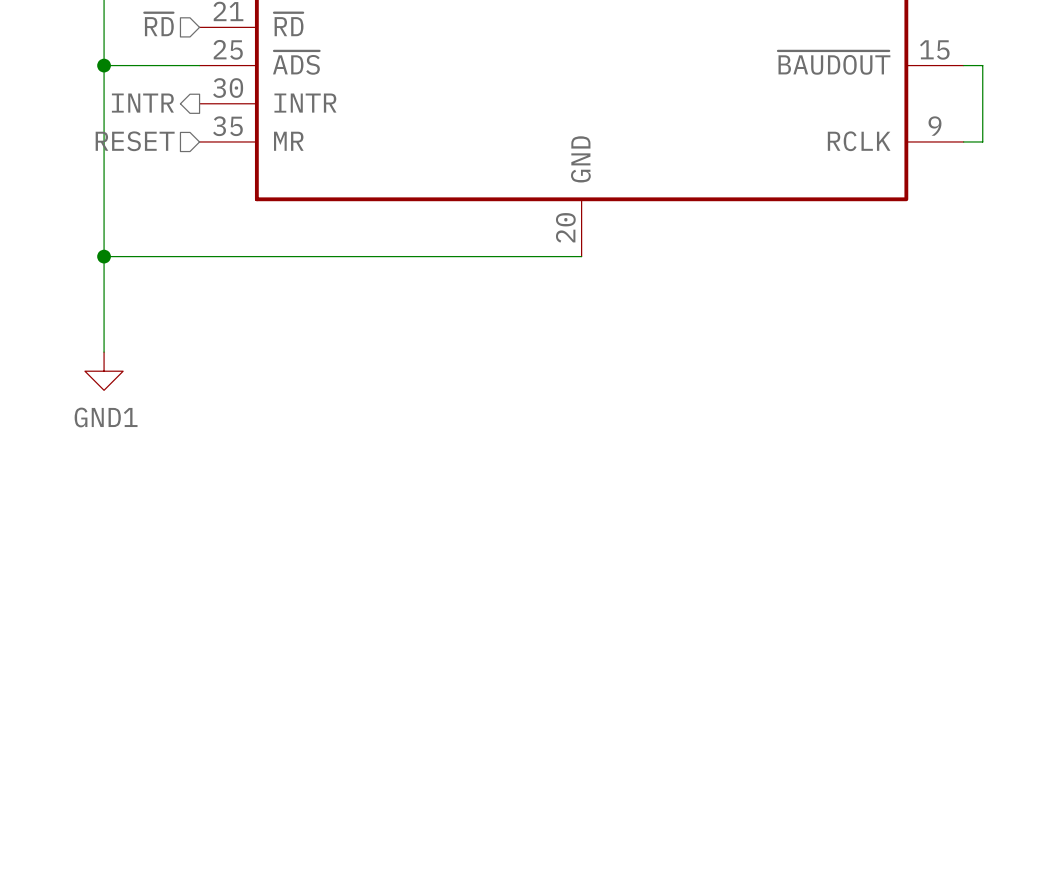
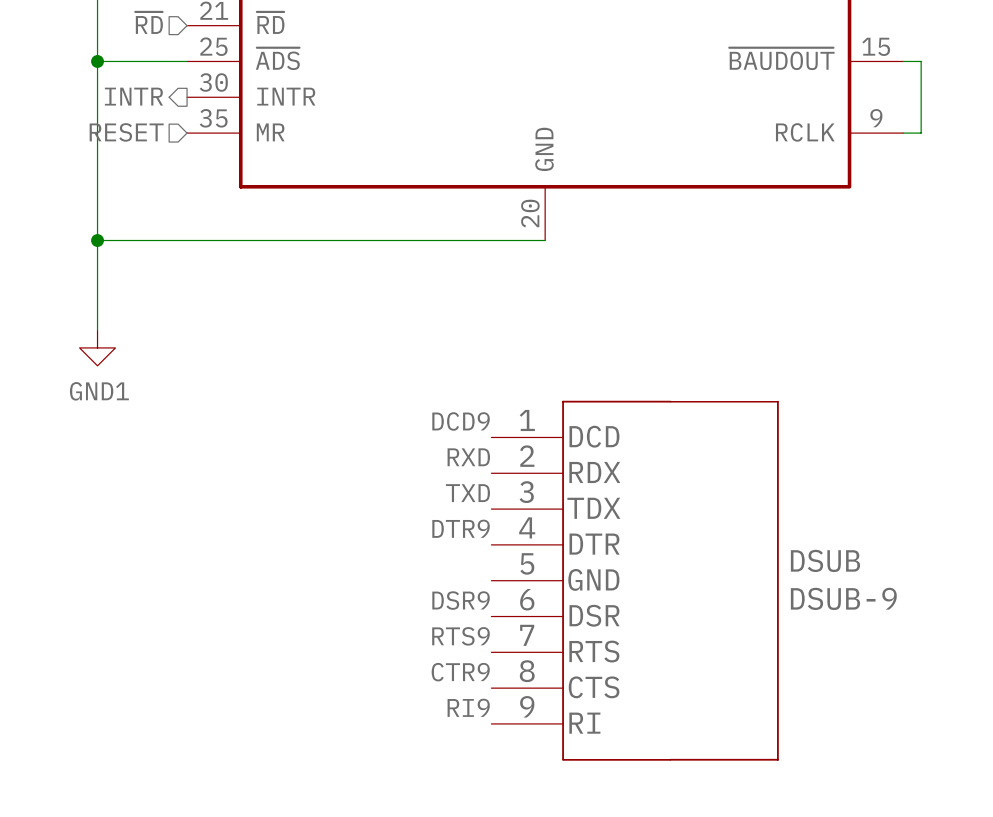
label: none -> DCD9 (461, 421)
label: none -> RXD (468, 457)
label: none -> TXD (467, 493)
label: none -> DTR9 (461, 528)
DSUB: none -> DSUB-9 (635, 580)
label: none -> DSR9 (461, 600)
label: none -> RTS9 (460, 636)
label: none -> CTR9 (460, 672)
label: none -> RI9 (468, 707)

